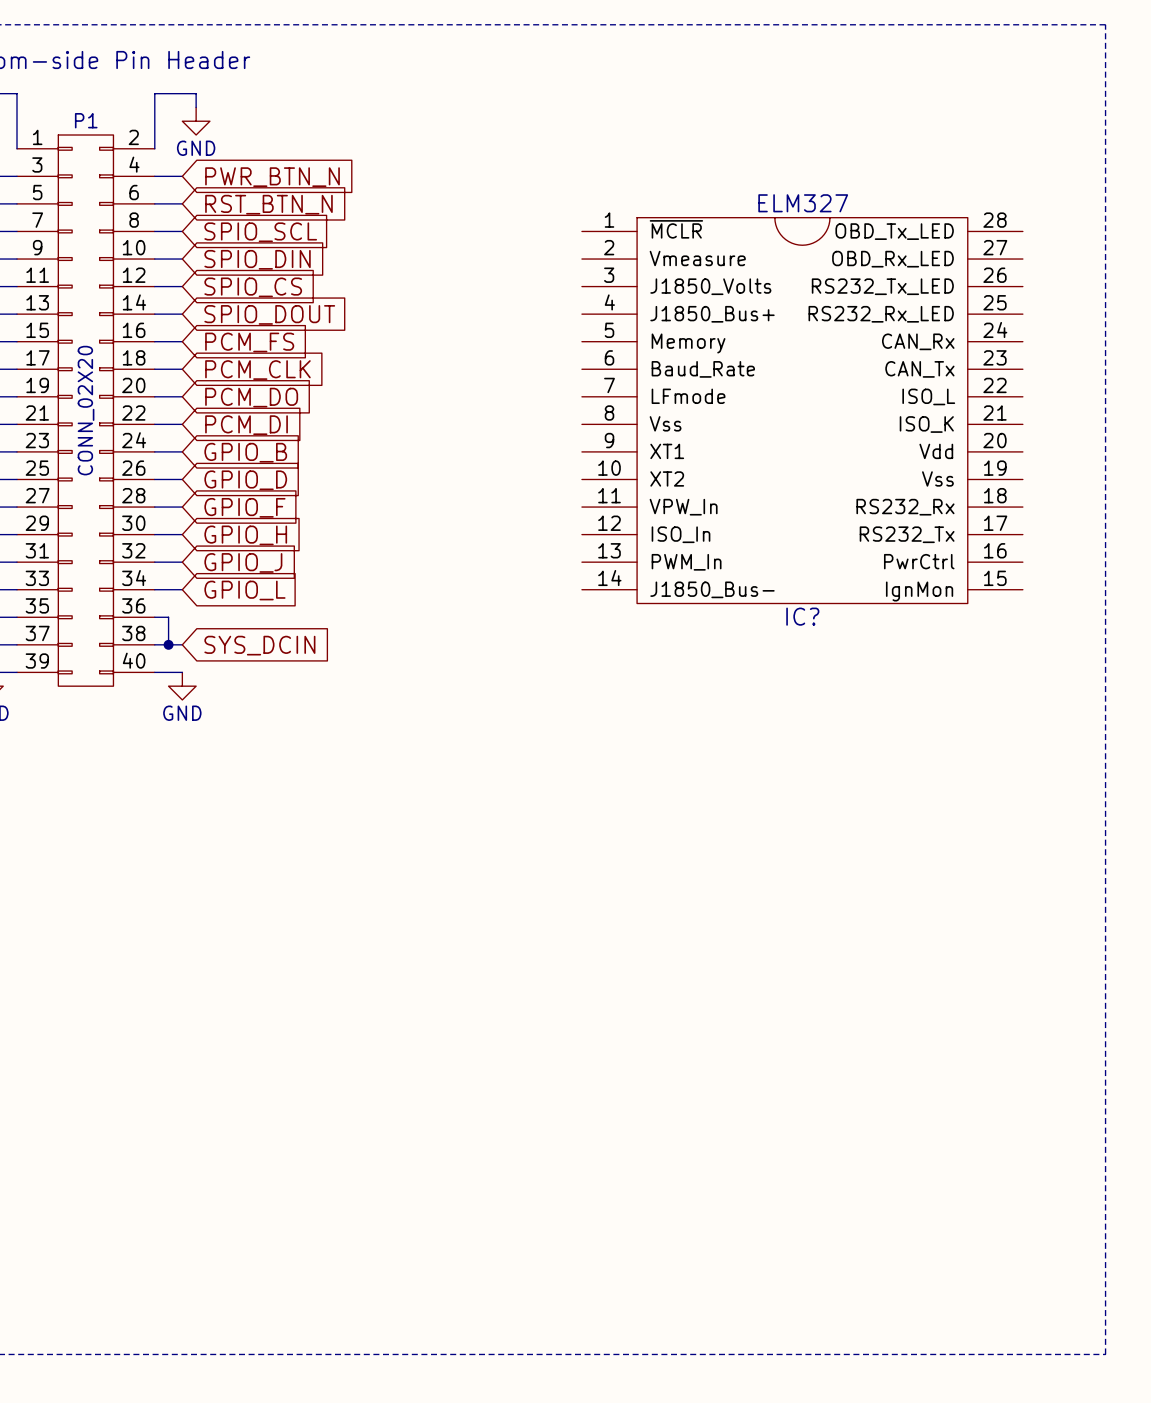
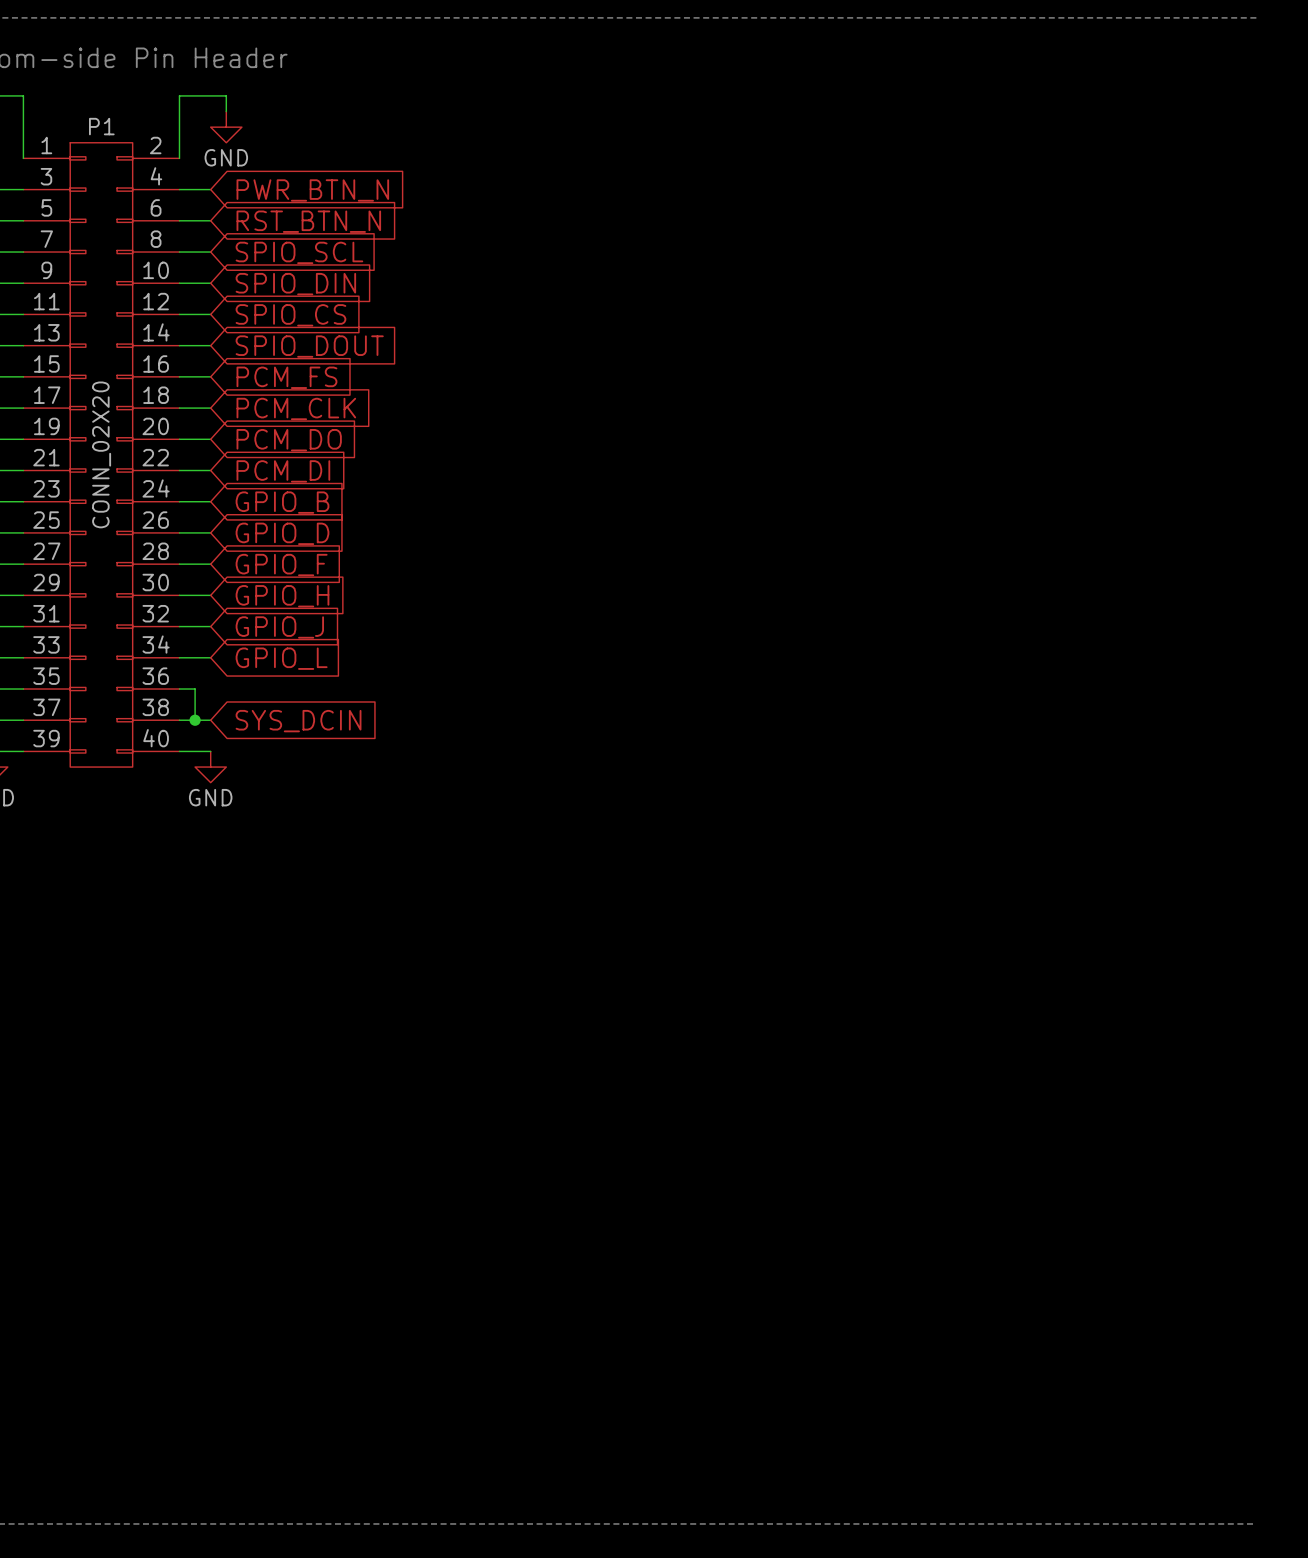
line: (1105, 24) (1105, 1354) -> none
IC?: ELM327 (802, 410) -> none

